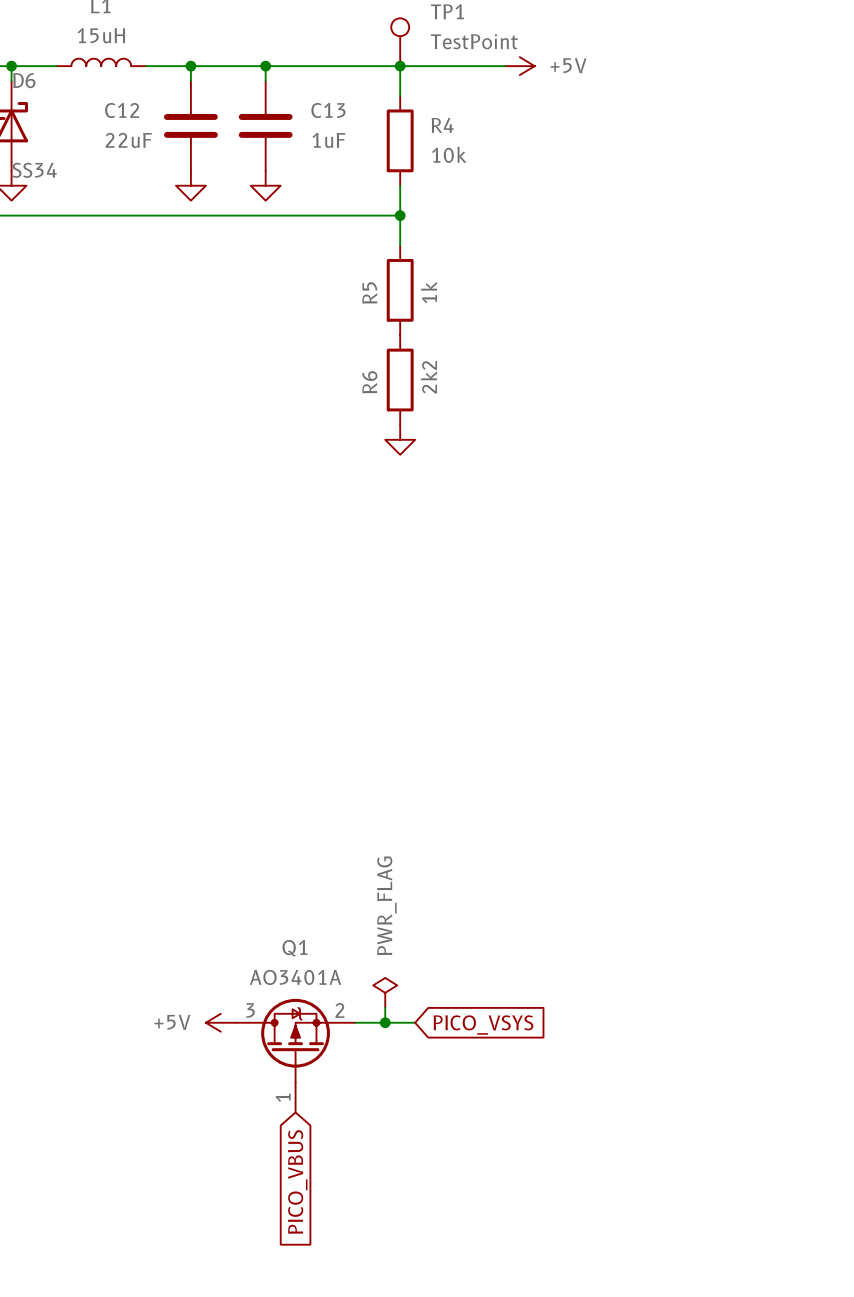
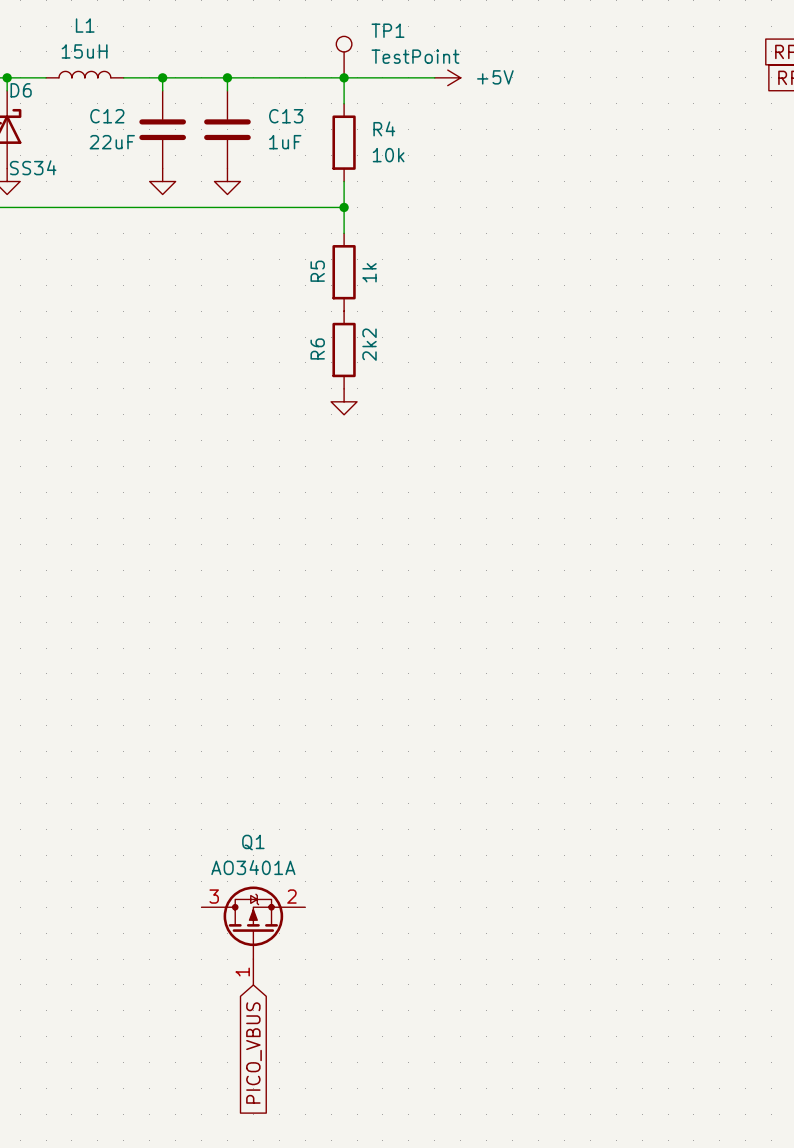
power symbol: PWR_FLAG (385, 992) -> none
wire: (385, 1007) (385, 1022) -> none
power symbol: +5V (220, 1022) -> none
wire: (355, 1022) (415, 1022) -> none
junction: (385, 1022) -> none
global label: PICO_VSYS (483, 1025) -> none

